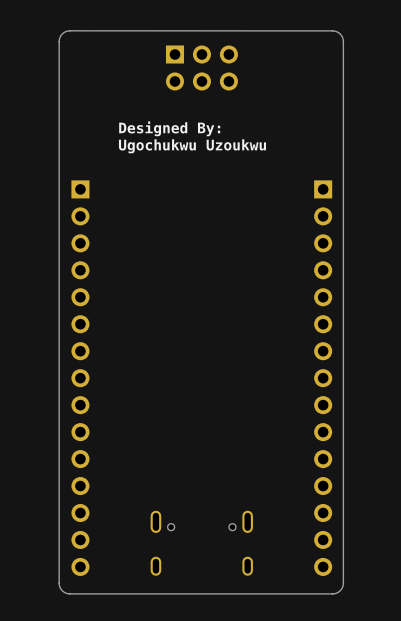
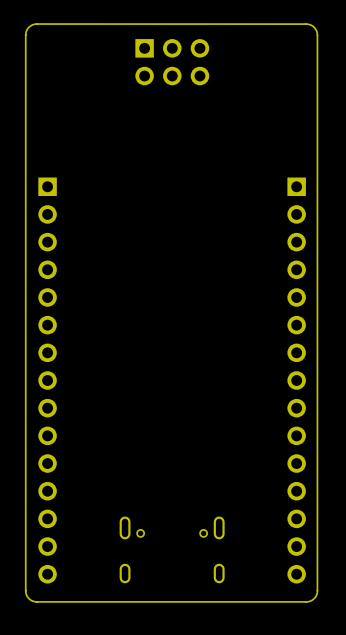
text: Designed By: (169, 128) -> none
text: Ugochukwu Uzoukwu (192, 146) -> none

